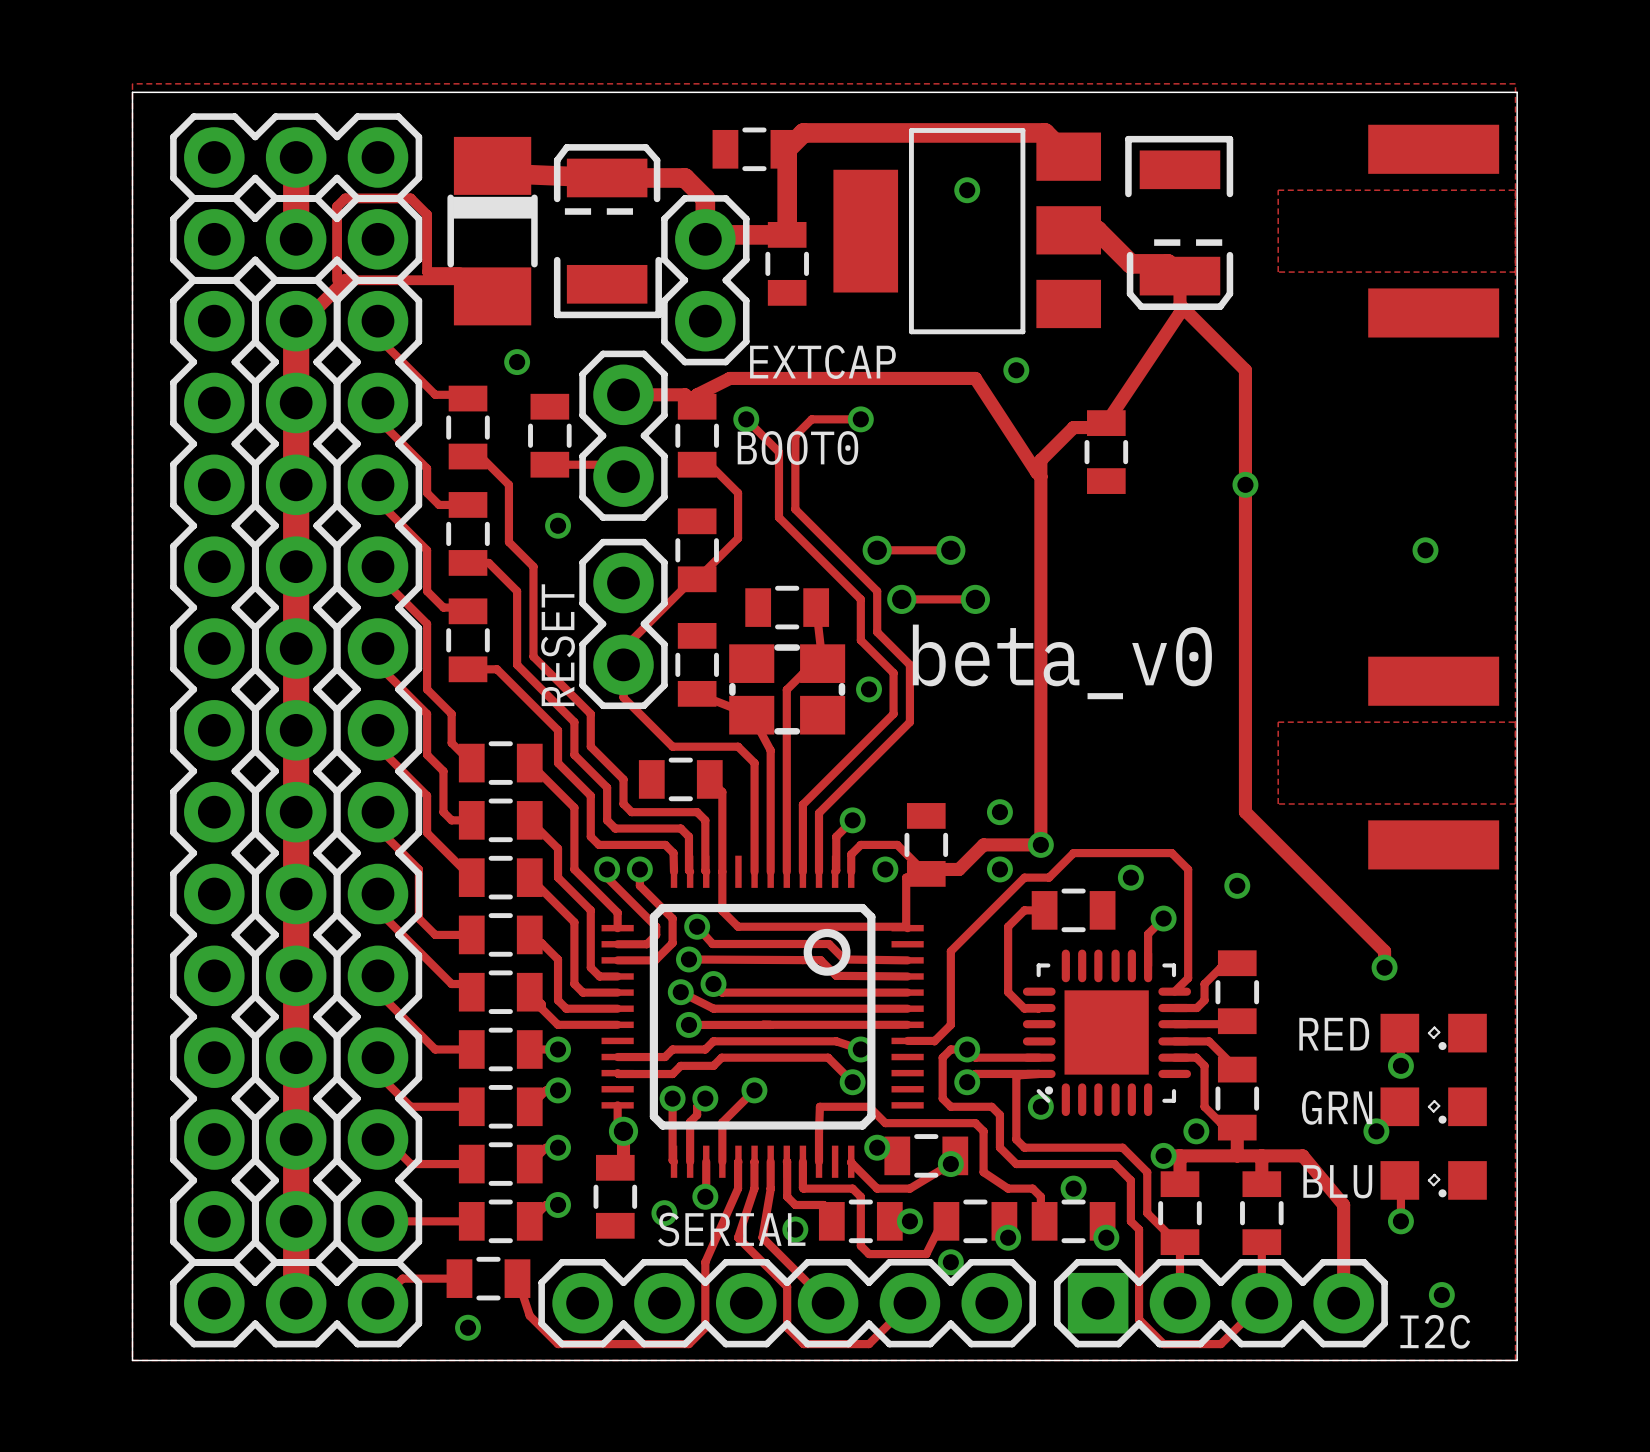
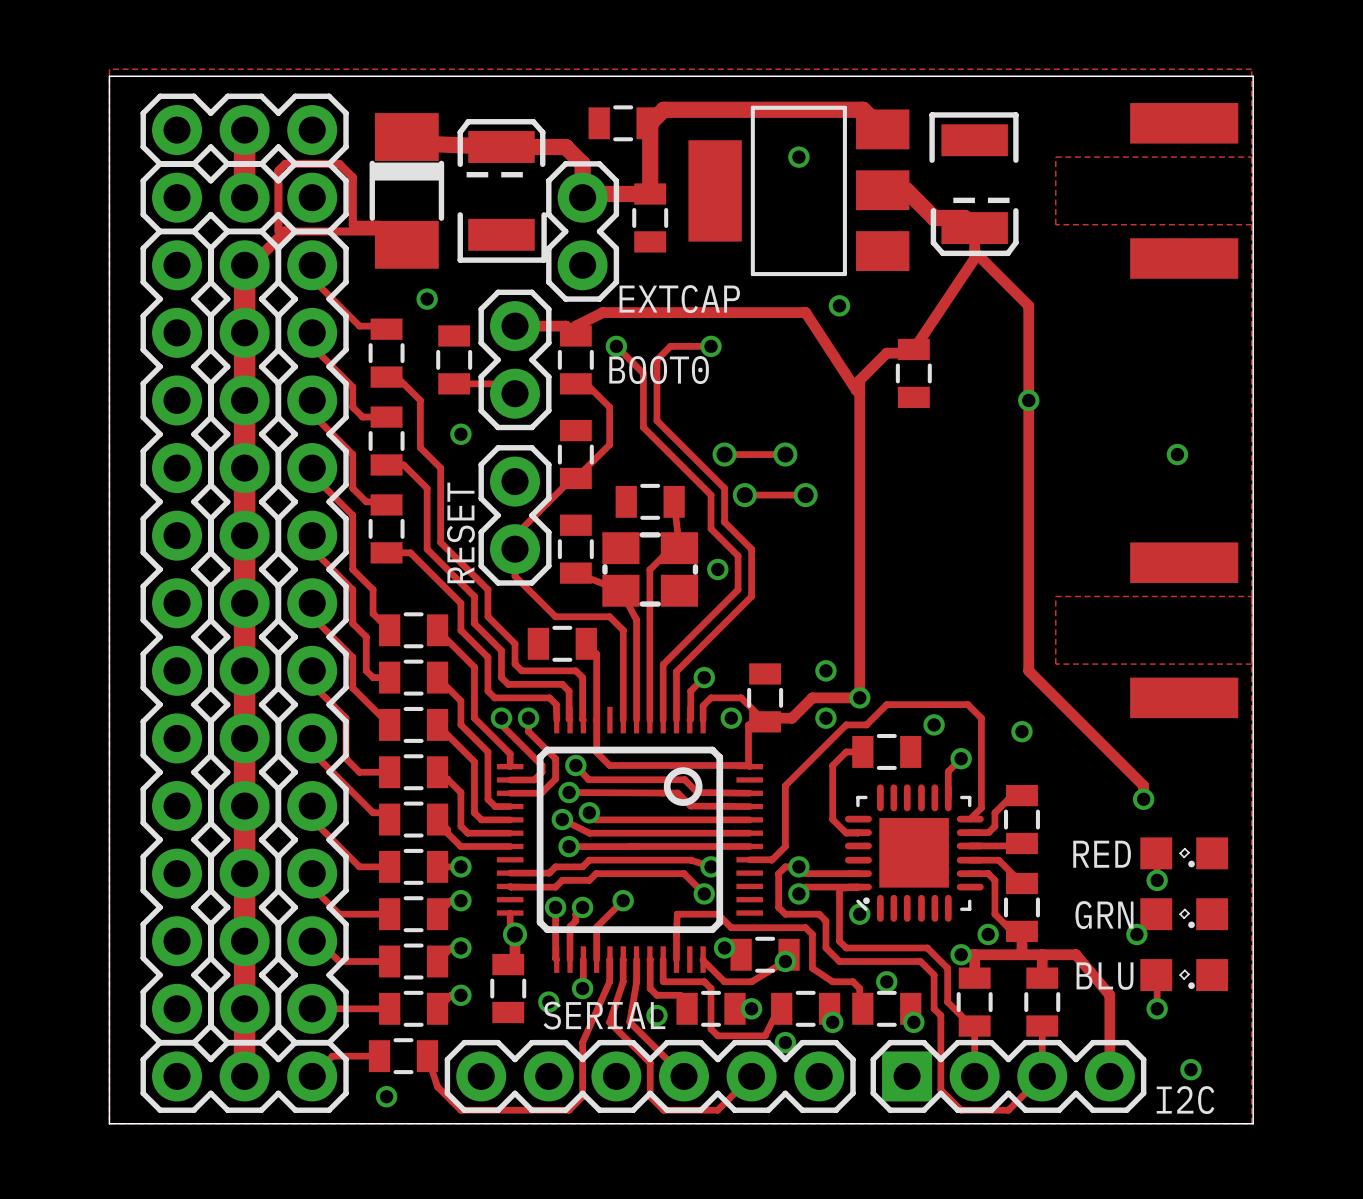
text: beta_v0 (1062, 661) -> none

